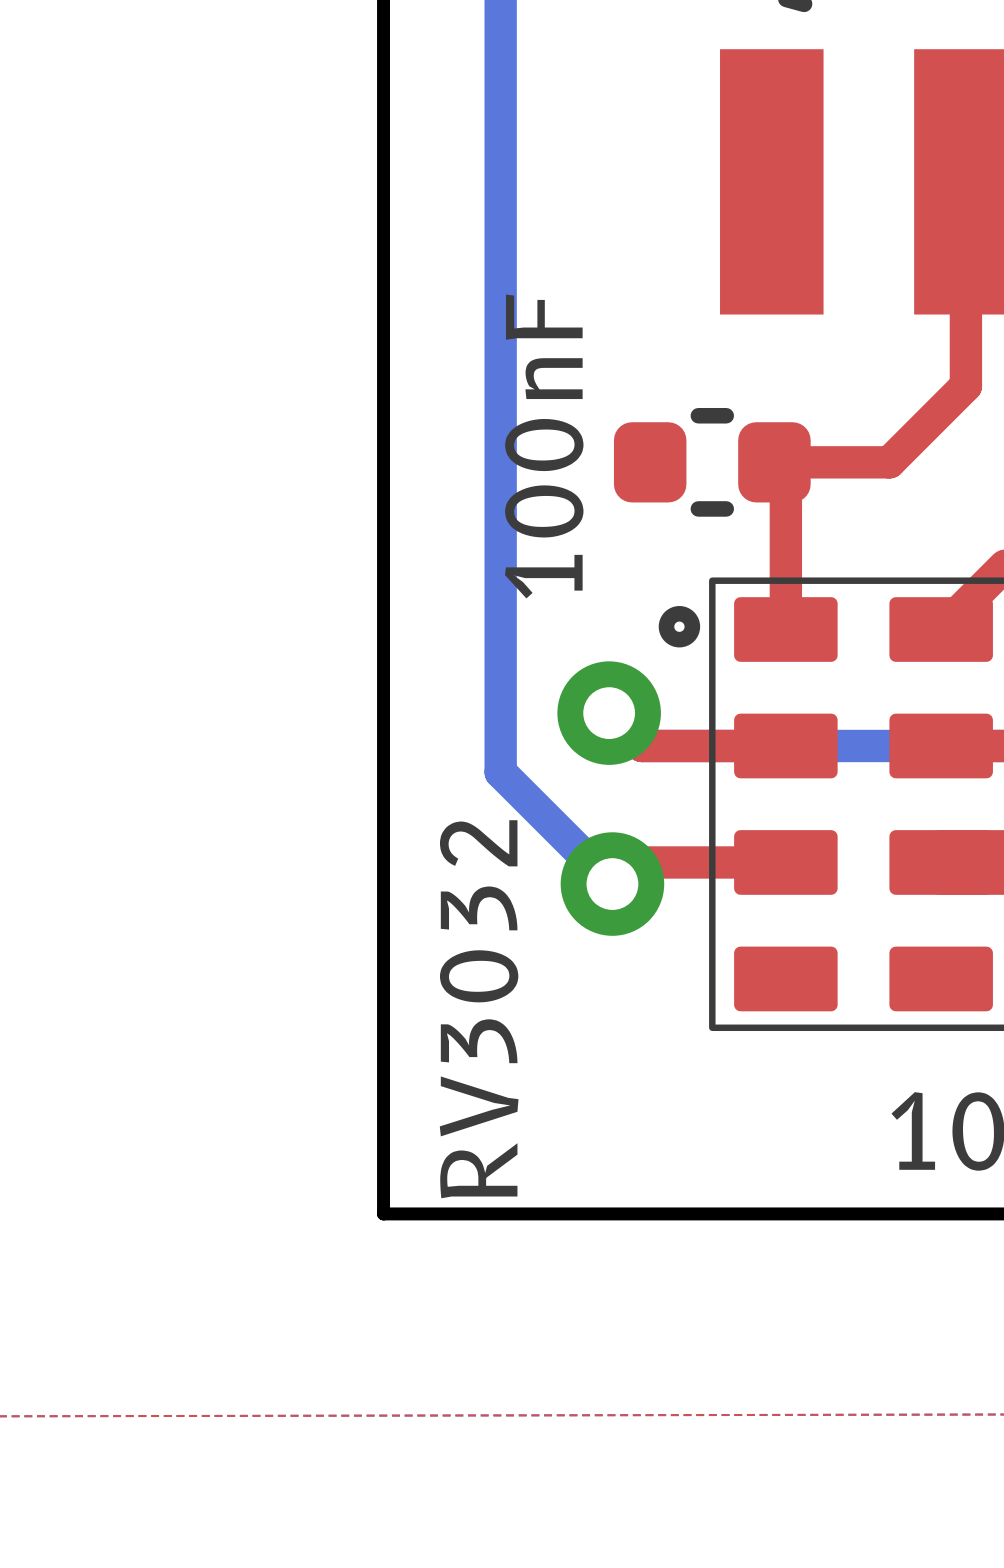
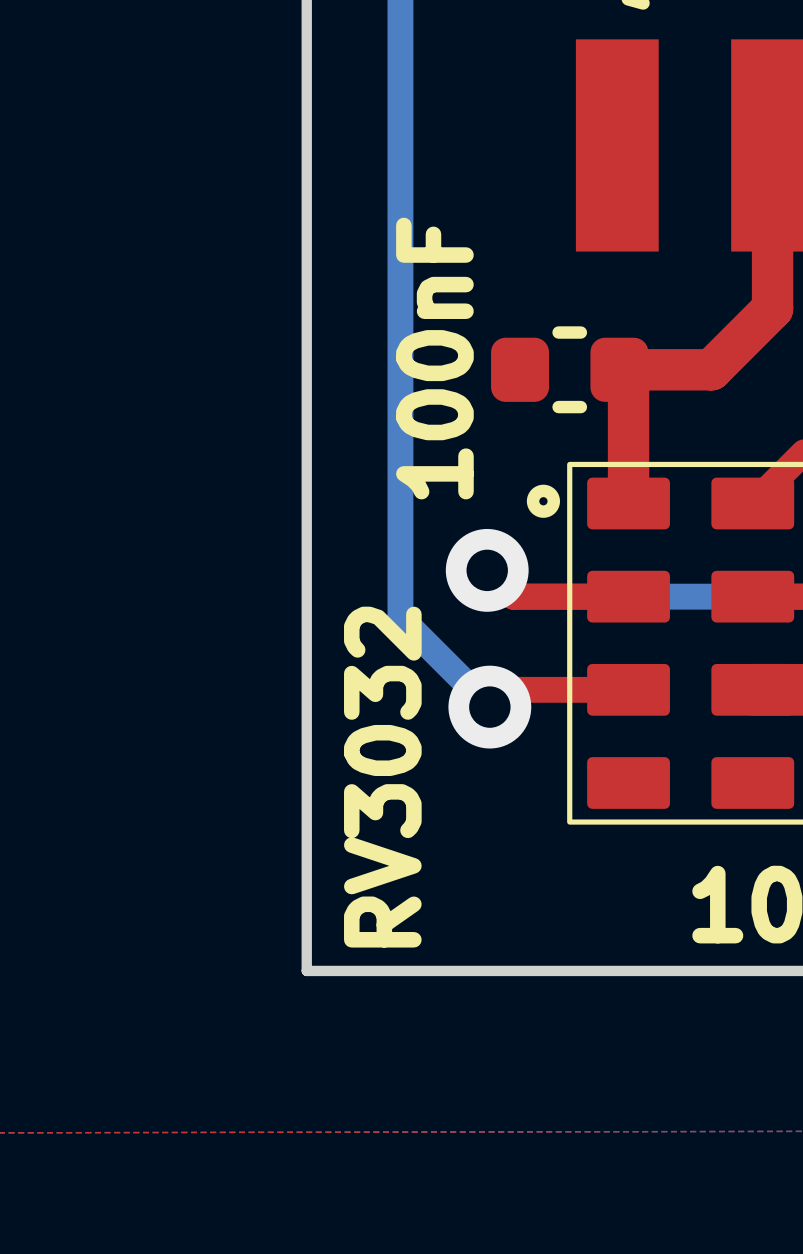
top track width: thin (965, 181) (965, 385) (889, 462) (774, 462) (785, 473) (785, 629) -> thick (772, 145) (772, 308) (711, 369) (619, 369) (628, 378) (628, 503)

